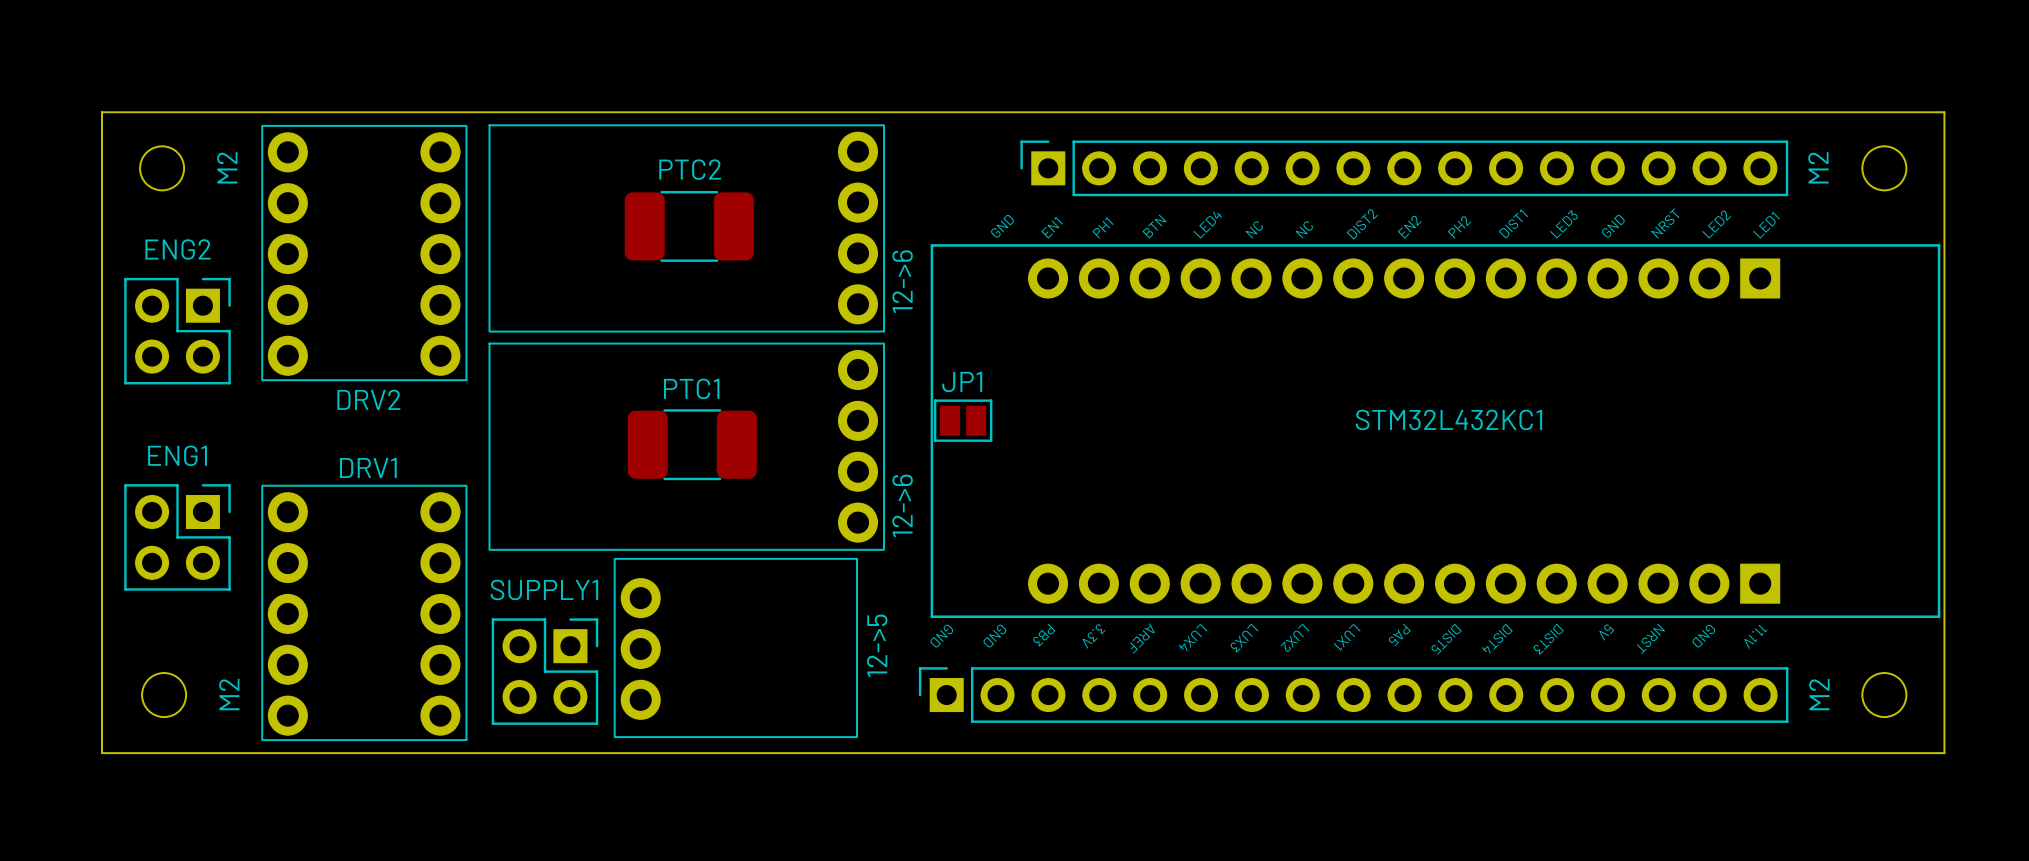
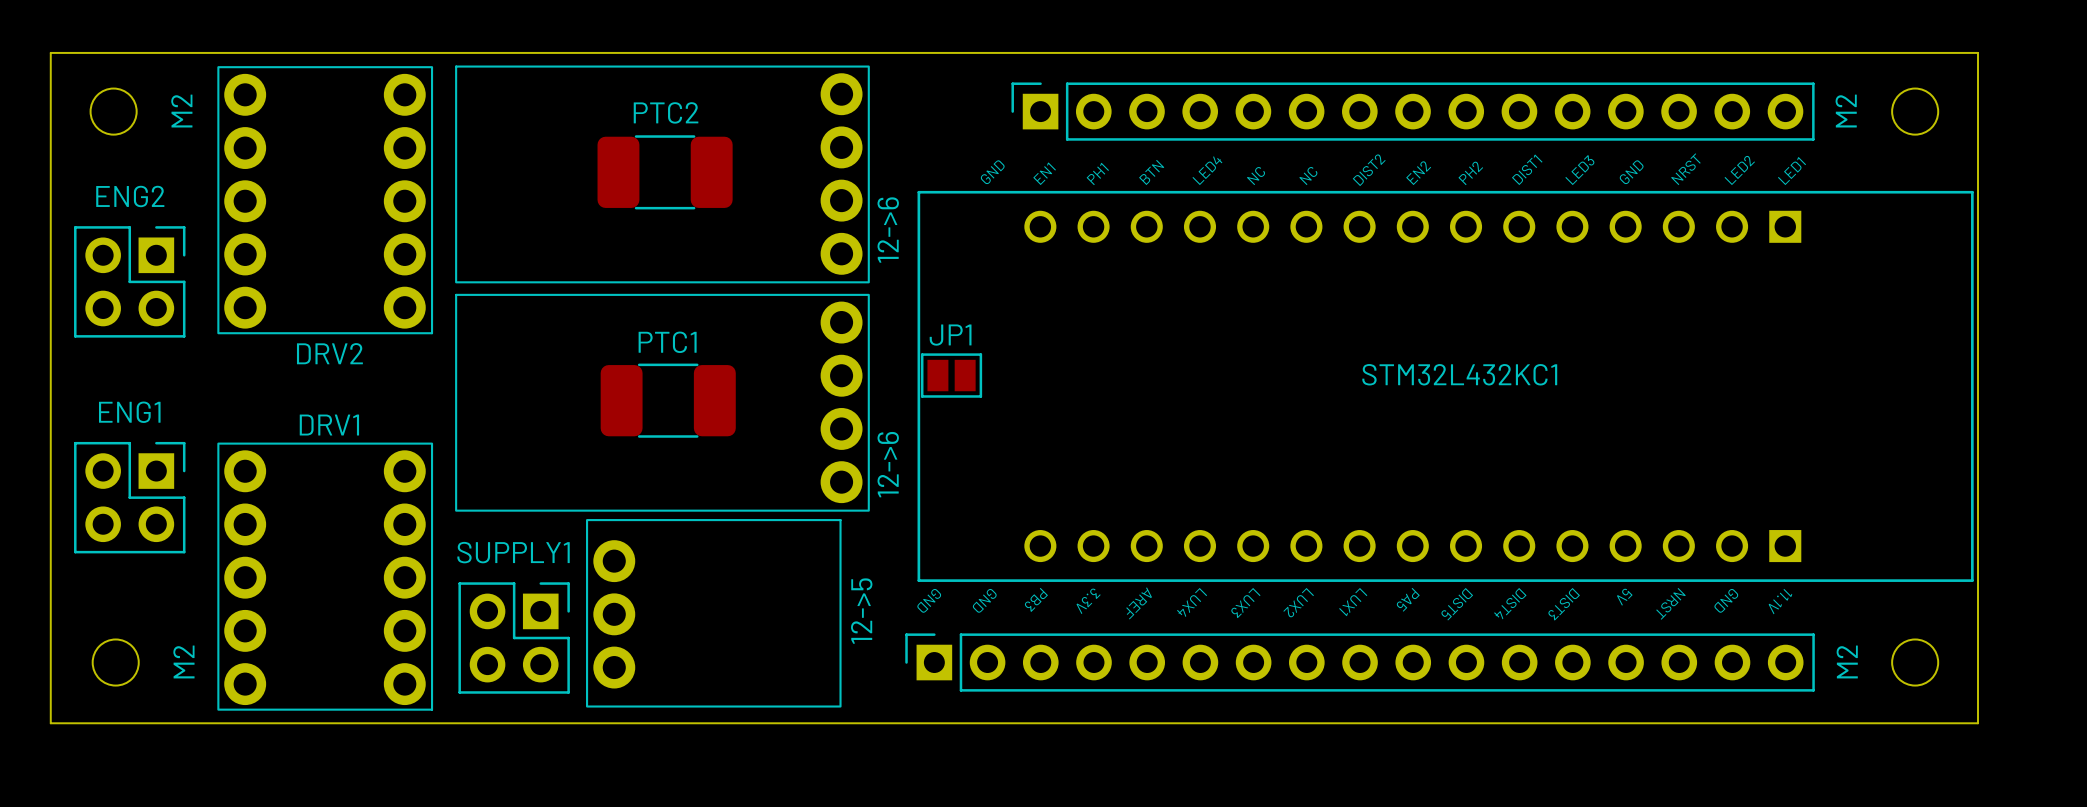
STM32L432KC1 footprint: [930, 244, 1941, 619] -> [917, 190, 1974, 582]

